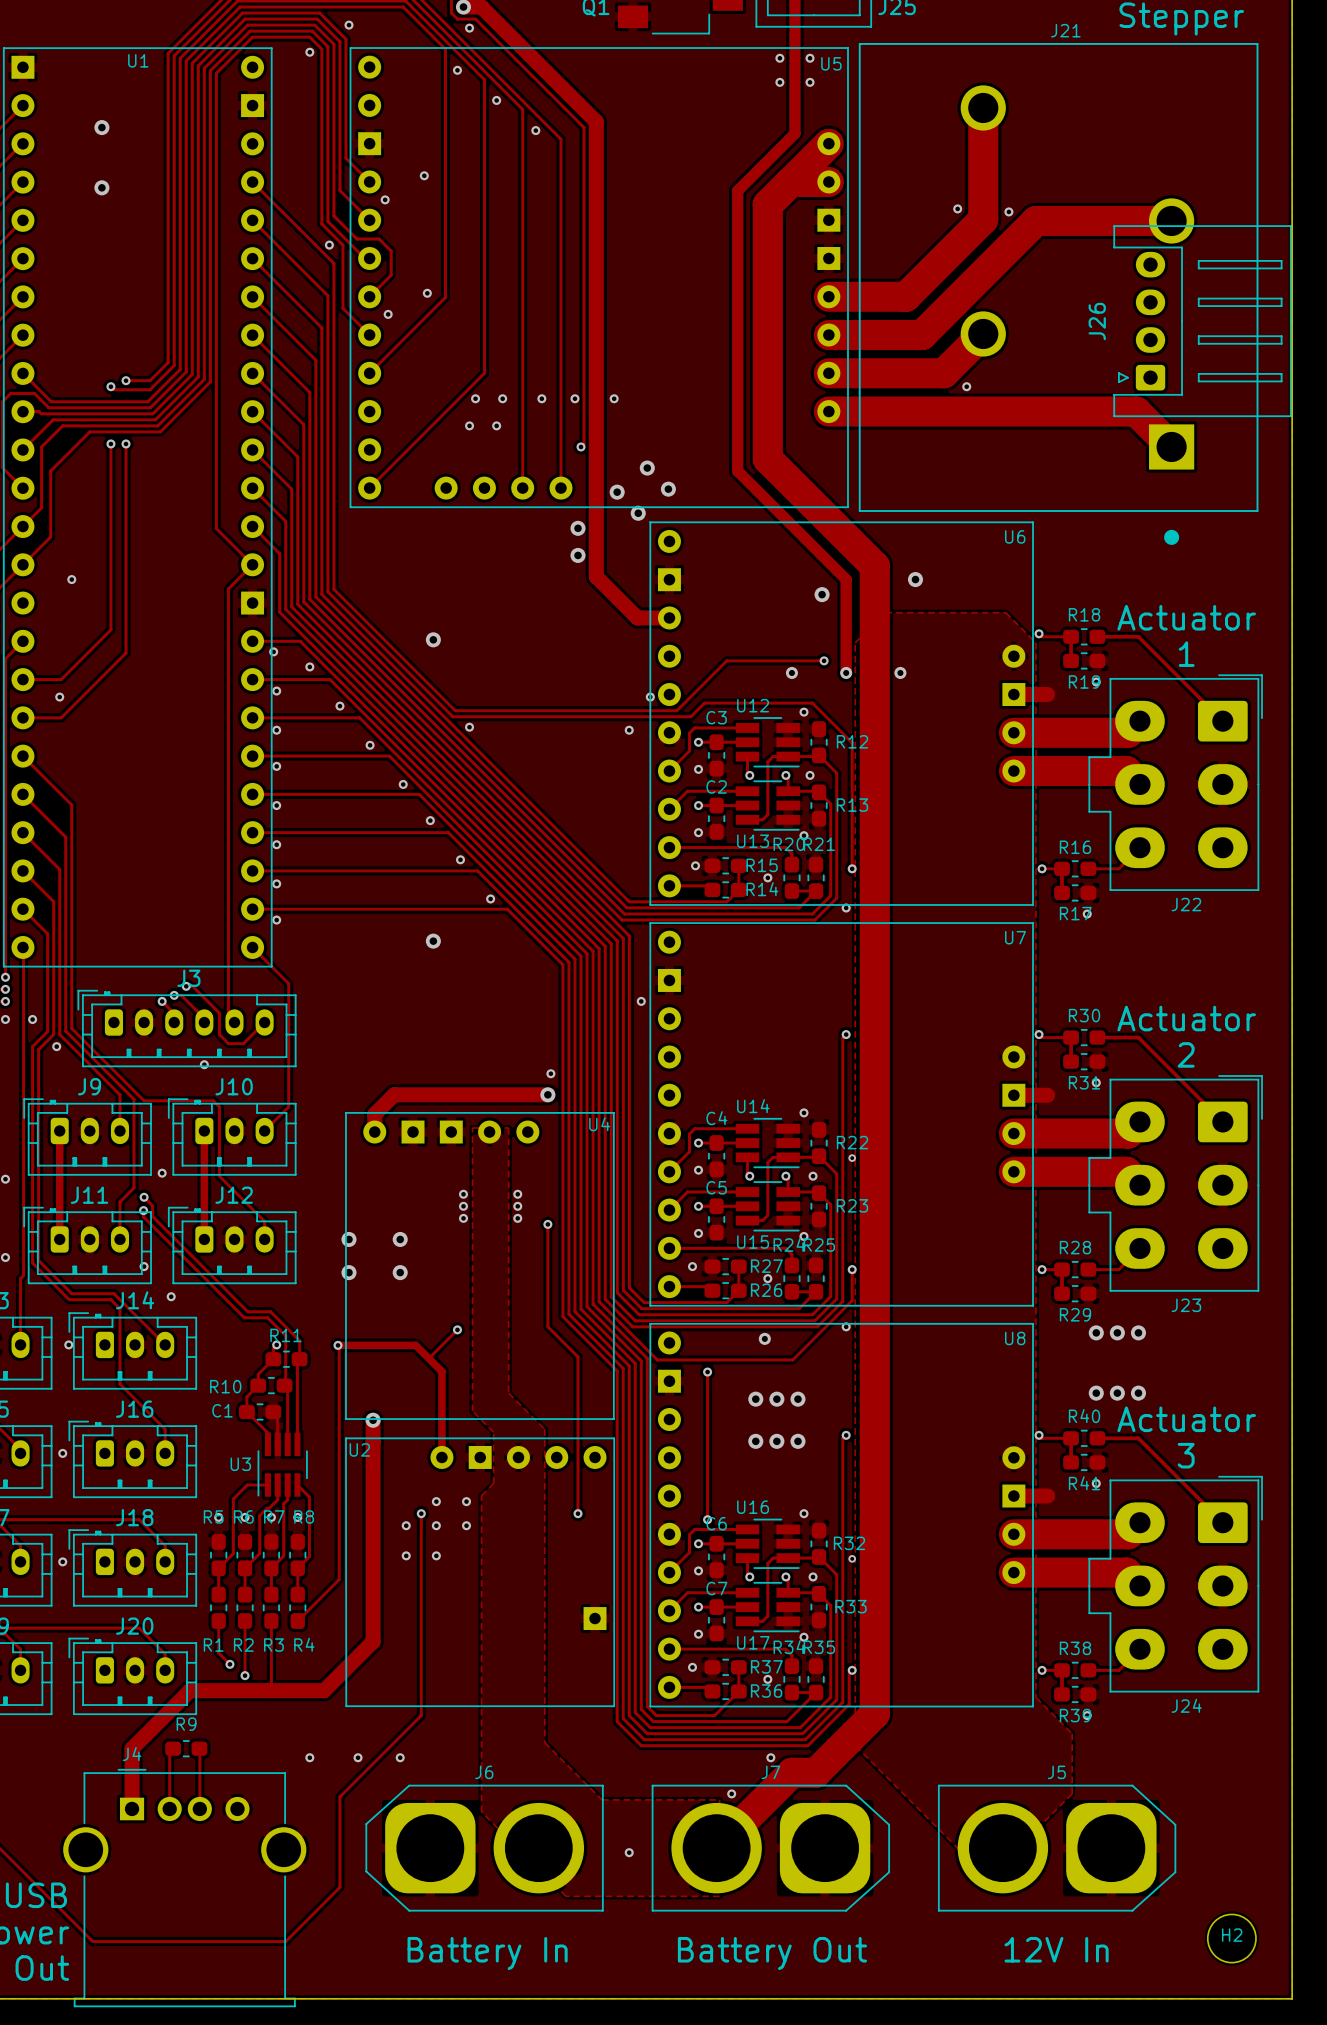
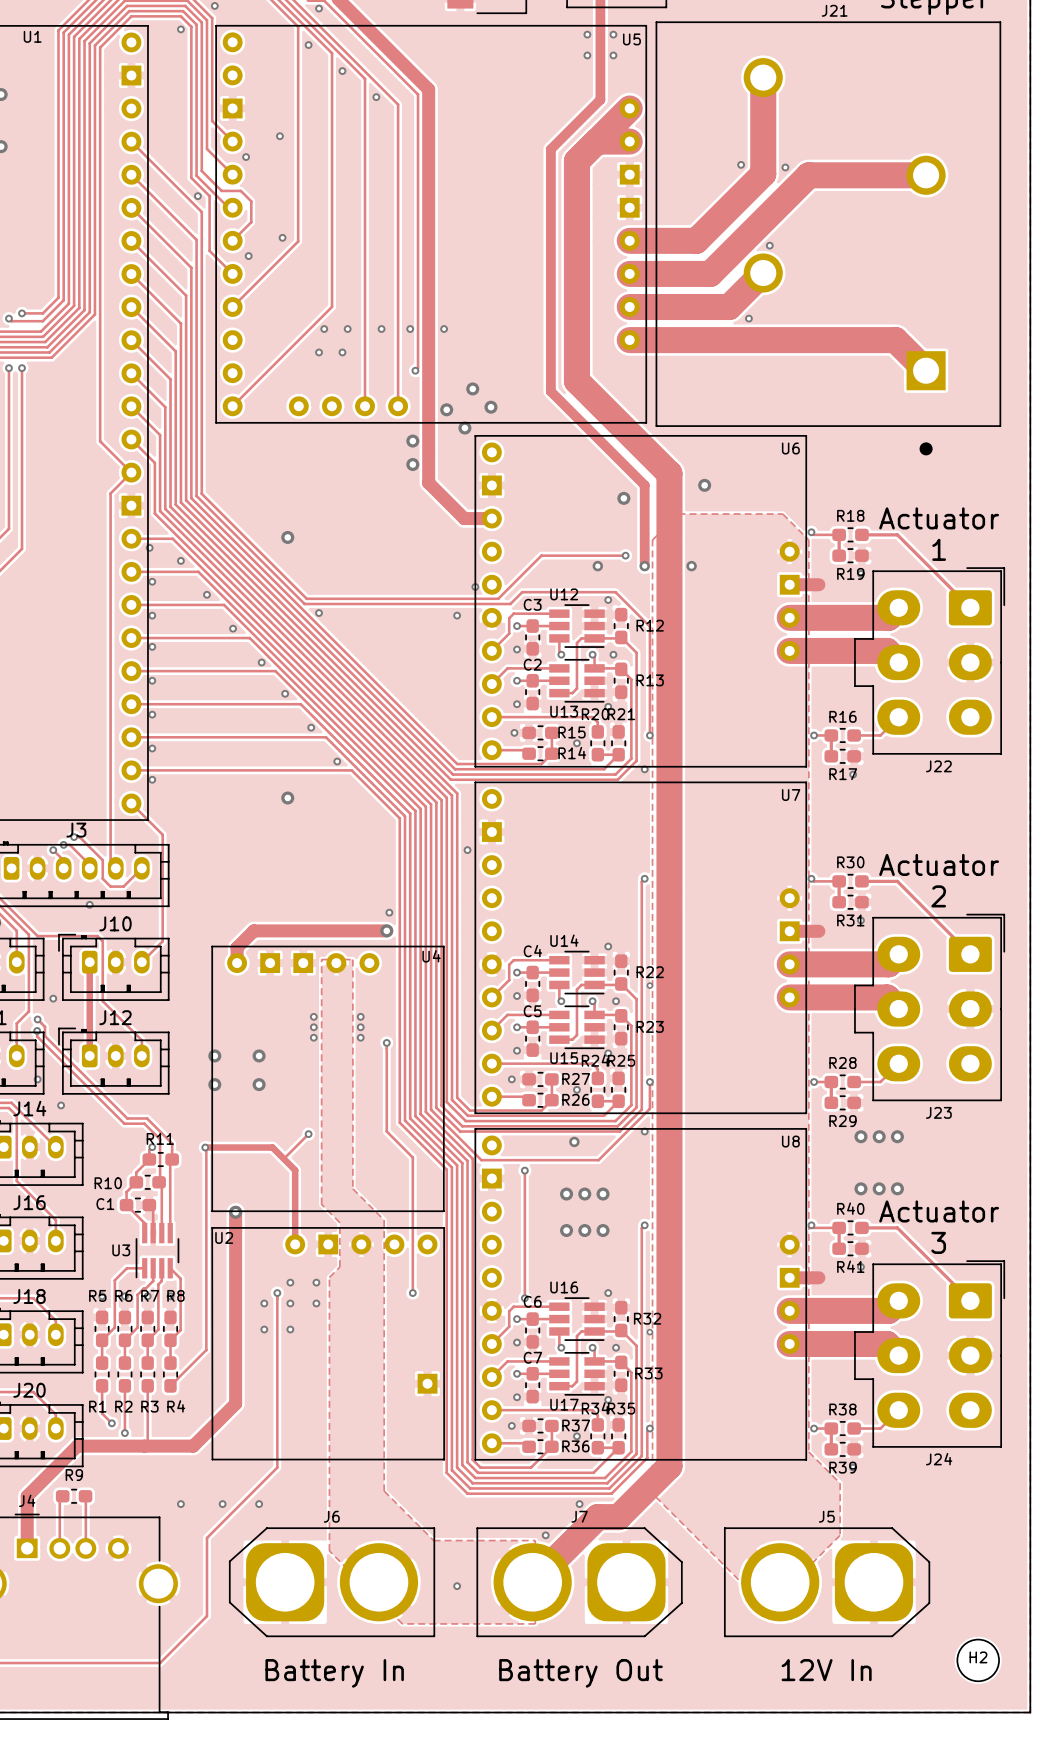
via: none -> (769, 245)
J26: (1202, 321) -> none

